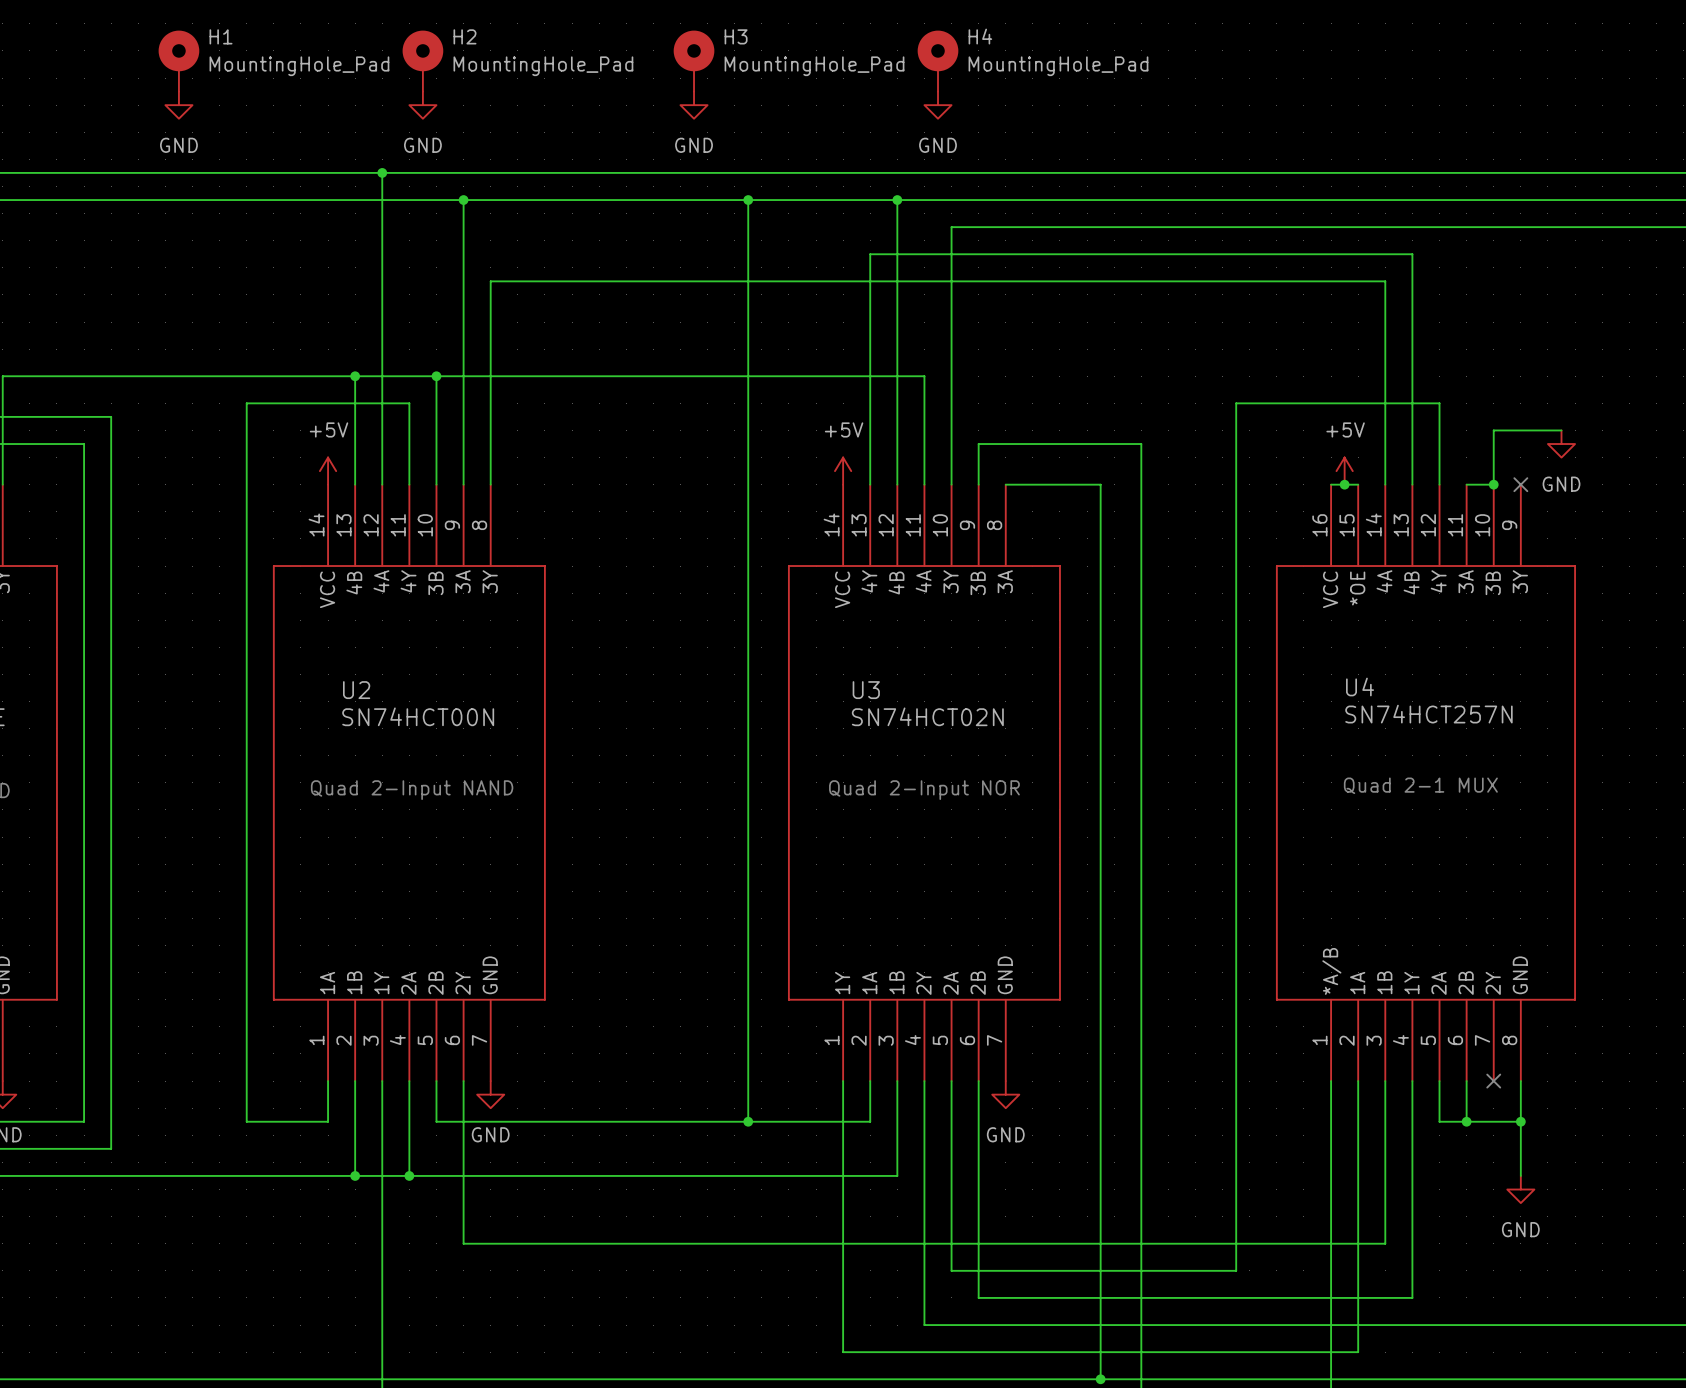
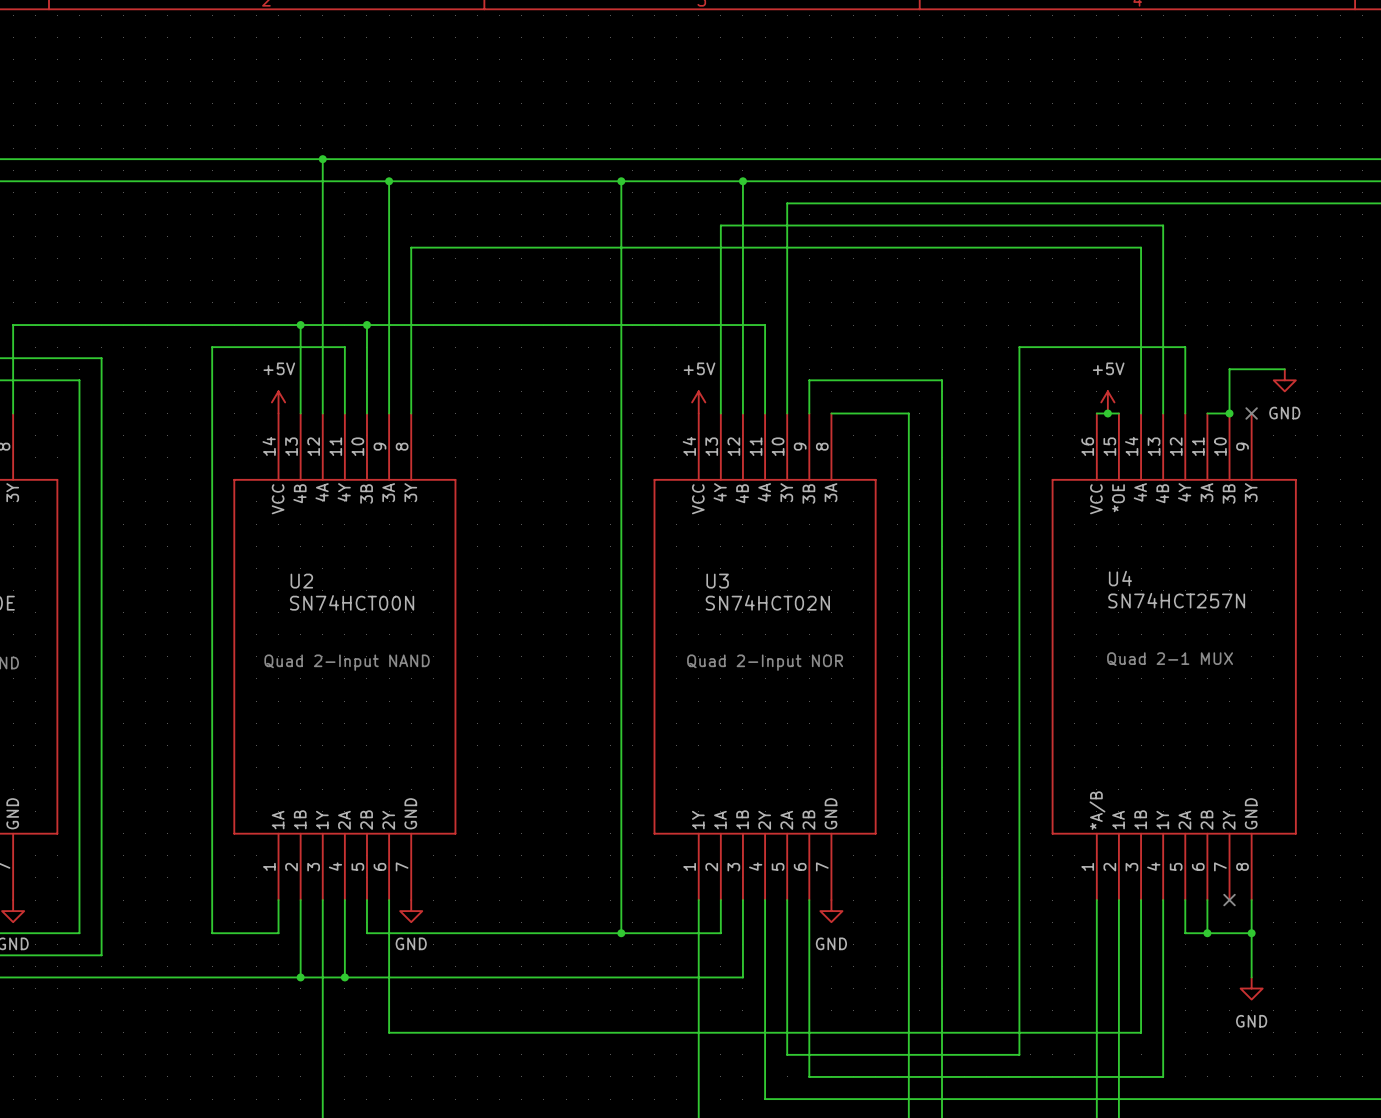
H1: MountingHole_Pad (178, 61) -> none
H2: MountingHole_Pad (422, 61) -> none
H3: MountingHole_Pad (694, 61) -> none
H4: MountingHole_Pad (938, 61) -> none
power symbol: GND (178, 105) -> none
power symbol: GND (422, 105) -> none
power symbol: GND (694, 105) -> none
power symbol: GND (938, 105) -> none

